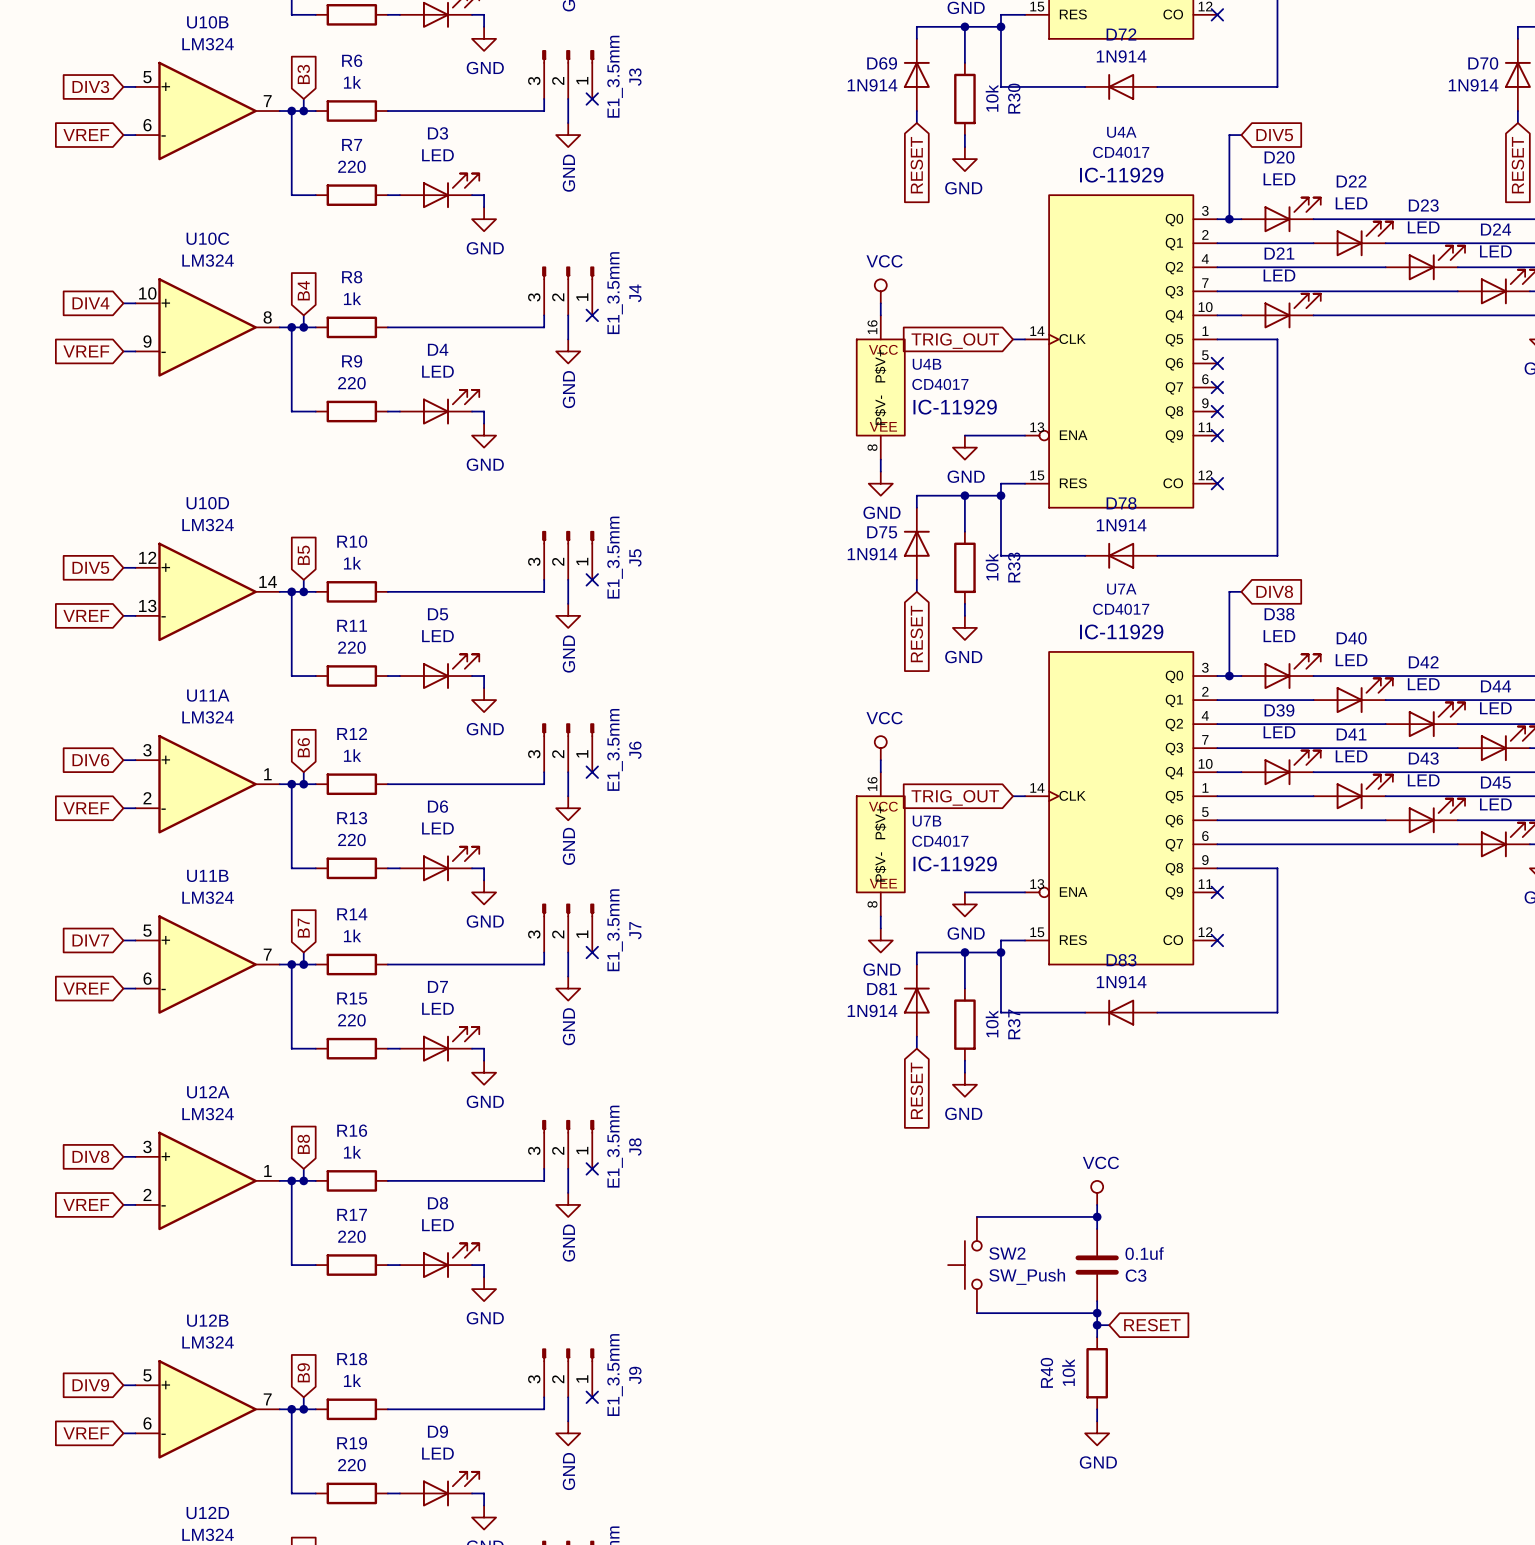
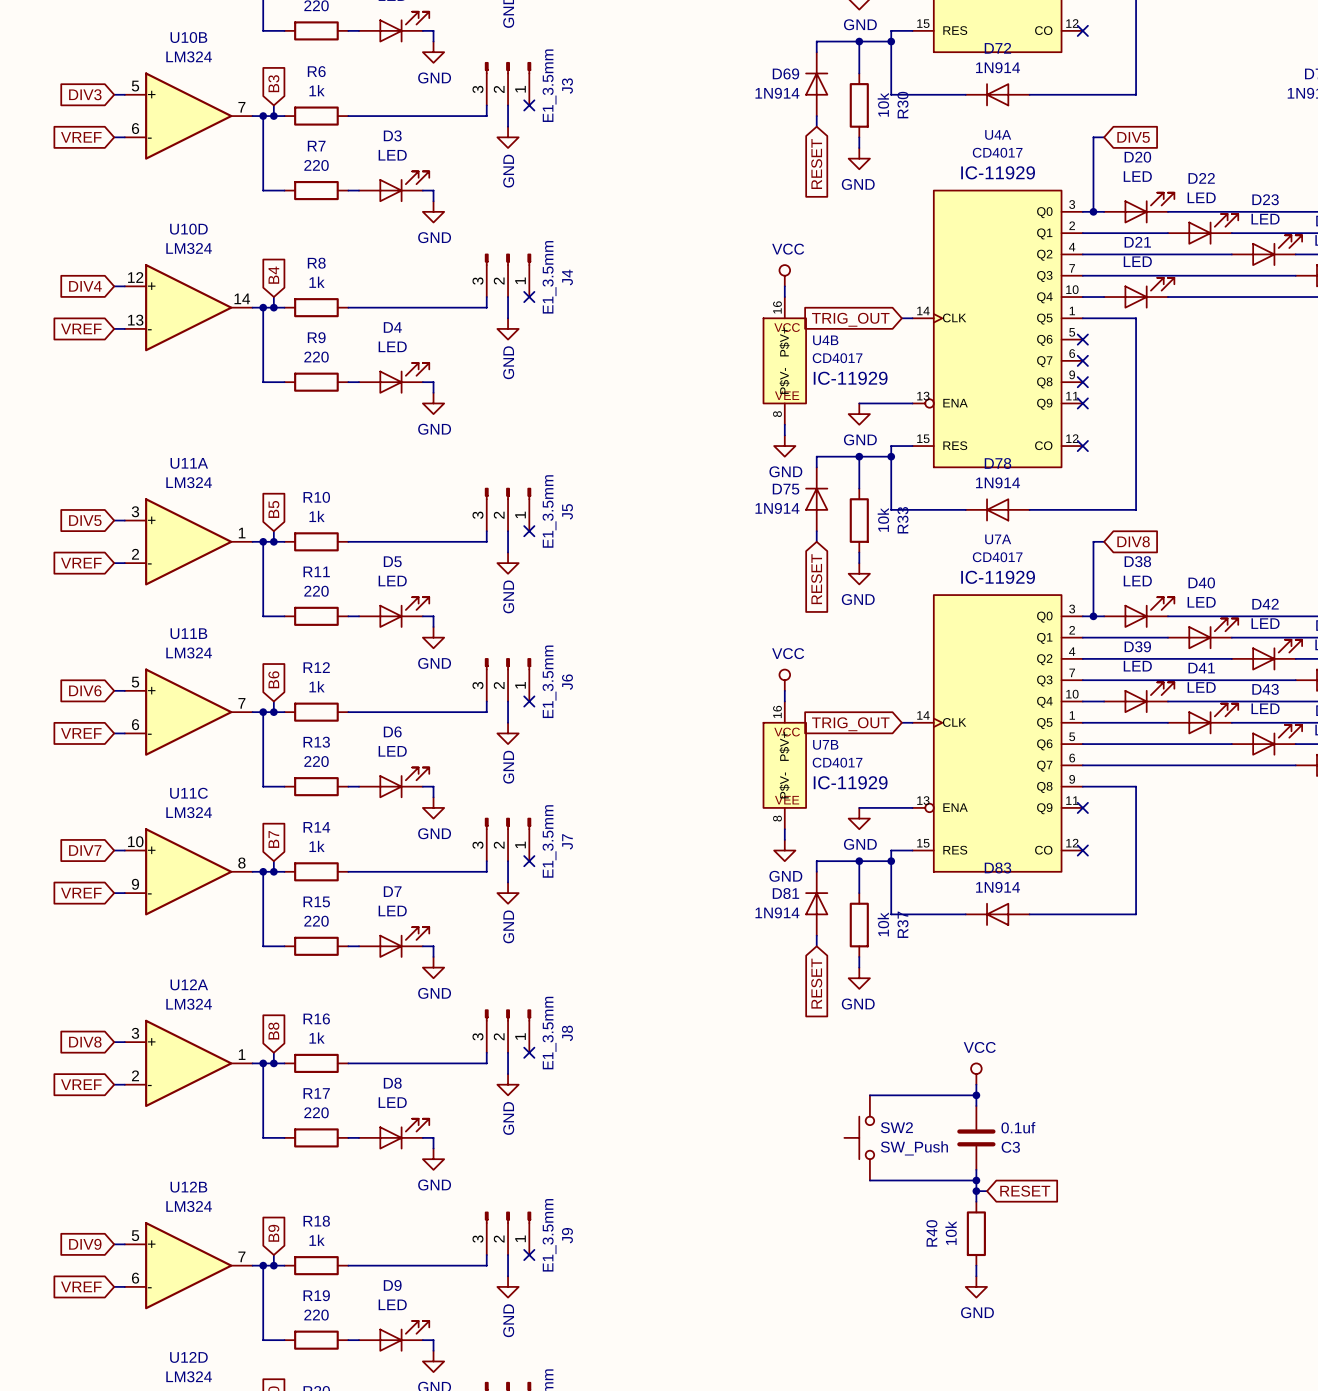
U10C: LM324 (207, 327) -> none
U10D position: (207, 591) -> (188, 307)
U11A position: (207, 784) -> (188, 541)
U11B position: (207, 964) -> (188, 712)
U11C: none -> LM324 (188, 871)

